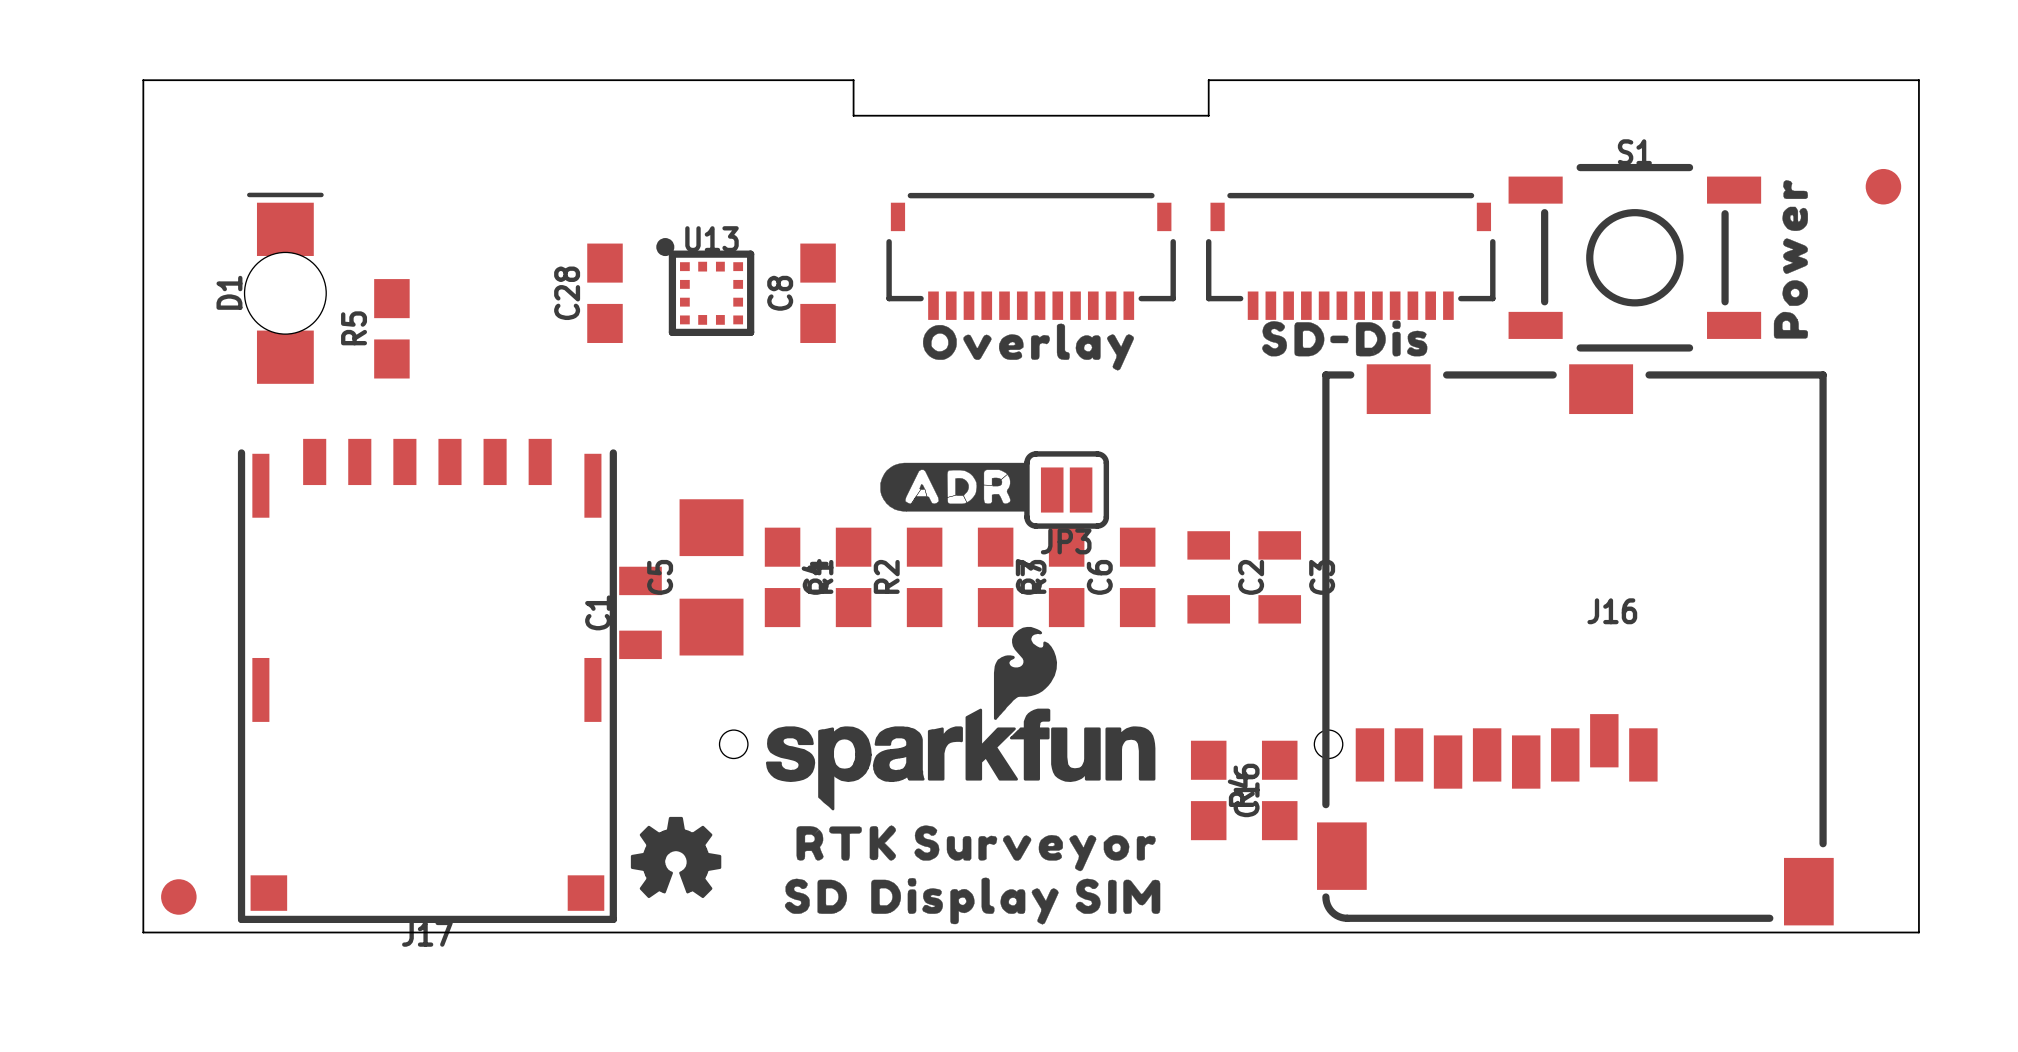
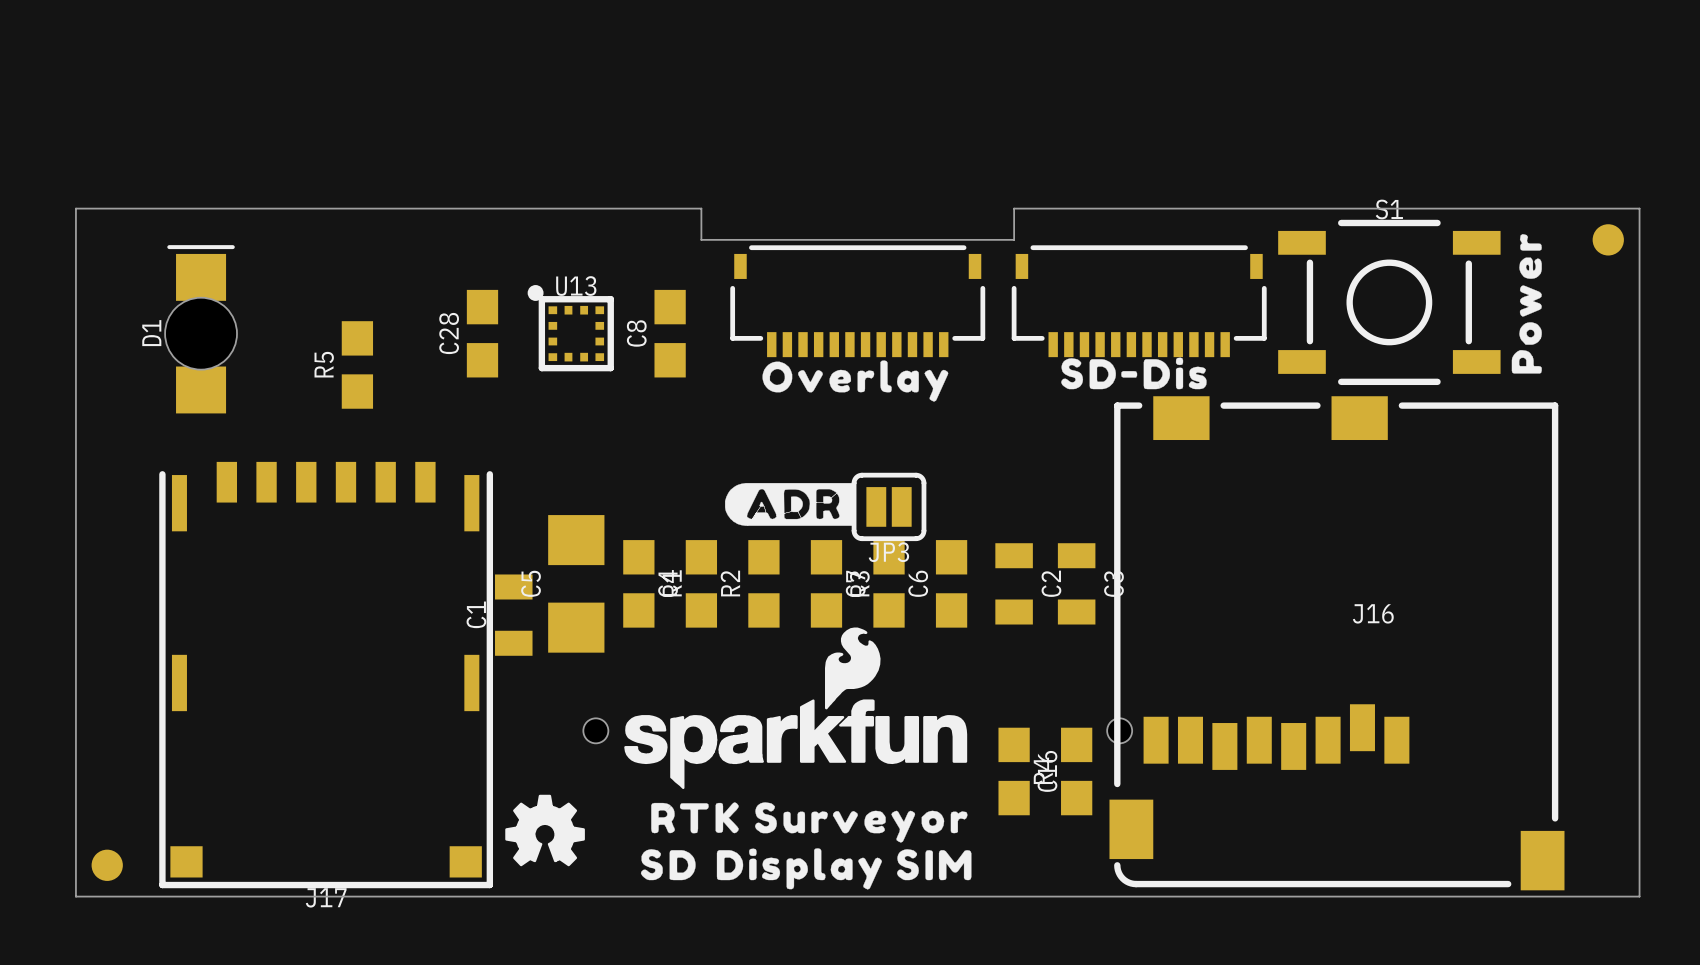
board edge: (143, 151) (143, 80) (853, 80) (853, 115) (1208, 115) (1208, 80) (1918, 80) (1918, 151) -> (75, 208) (701, 208) (701, 239) (1014, 239) (1014, 208) (1639, 208)
R5 position: (391, 328) -> (357, 364)

